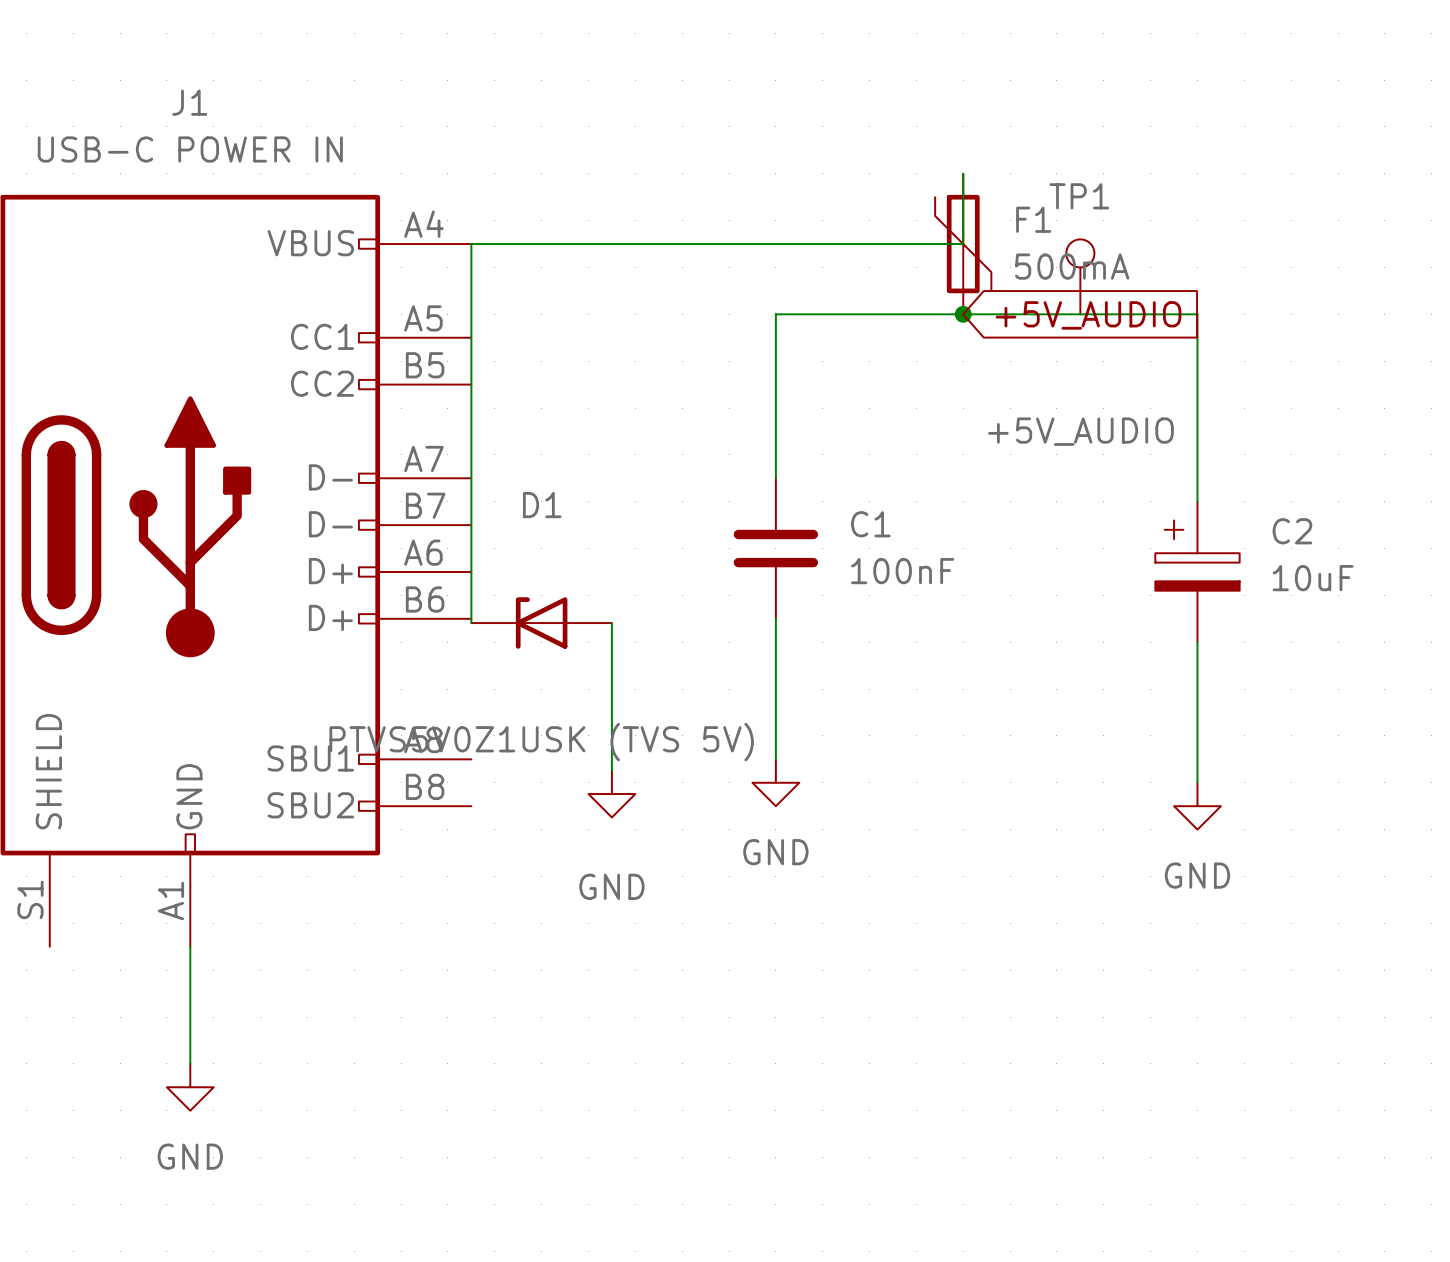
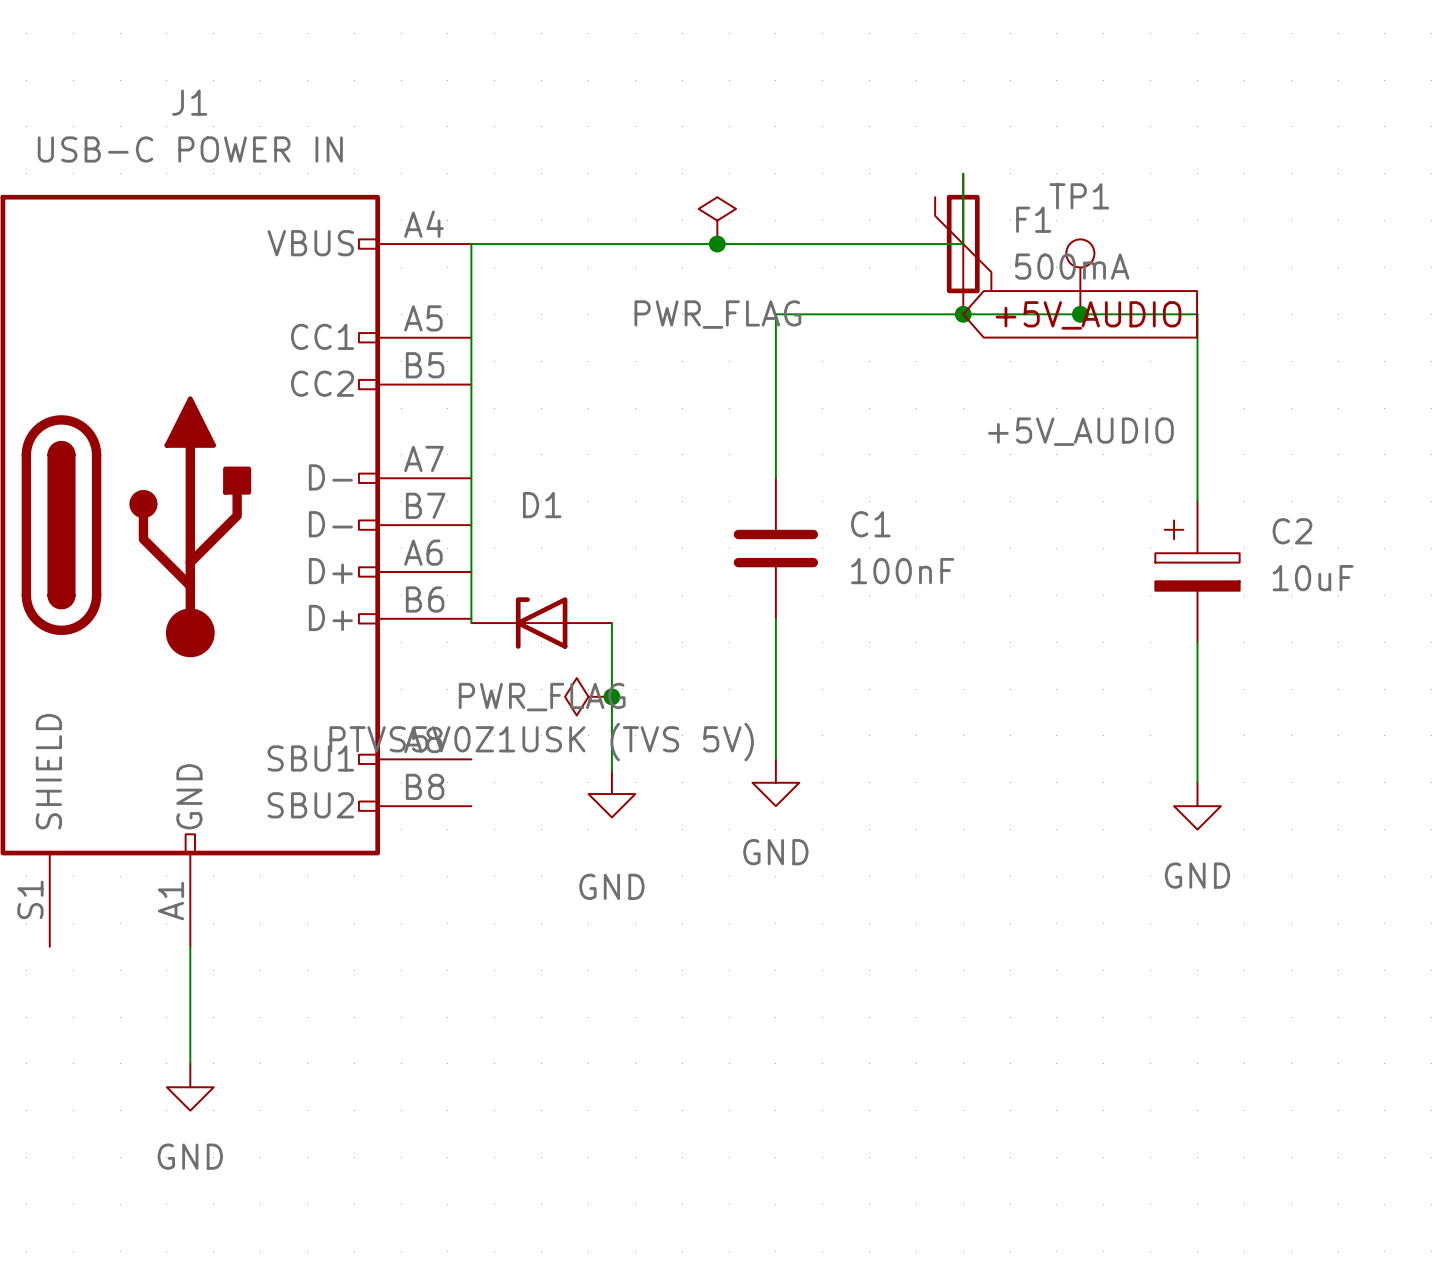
power symbol: none -> PWR_FLAG (717, 220)
junction: none -> (717, 244)
junction: none -> (1080, 314)
power symbol: none -> PWR_FLAG (588, 696)
junction: none -> (611, 696)

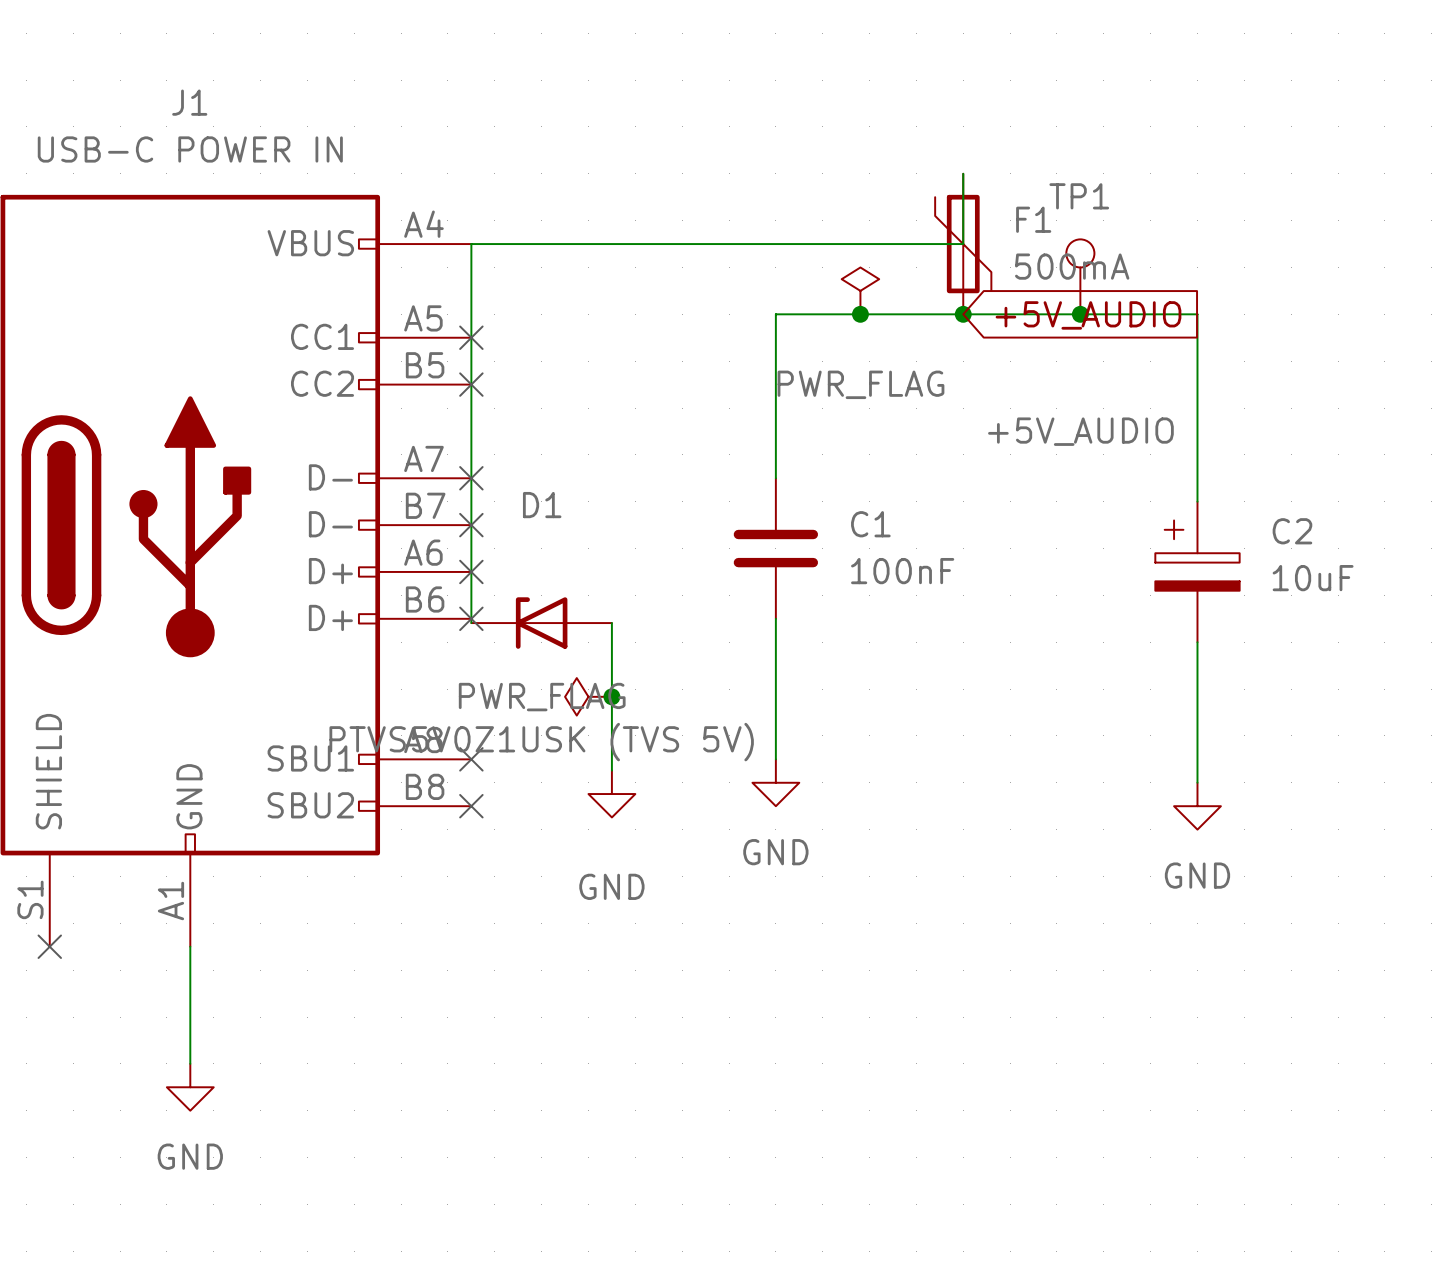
power symbol position: PWR_FLAG (717, 220) -> PWR_FLAG (860, 290)
junction: (717, 244) -> none
junction: none -> (860, 314)
no-connect mark: none -> (471, 337)
no-connect mark: none -> (471, 384)
no-connect mark: none -> (471, 478)
no-connect mark: none -> (471, 525)
no-connect mark: none -> (471, 571)
no-connect mark: none -> (471, 618)
no-connect mark: none -> (471, 759)
no-connect mark: none -> (471, 806)
no-connect mark: none -> (49, 946)

